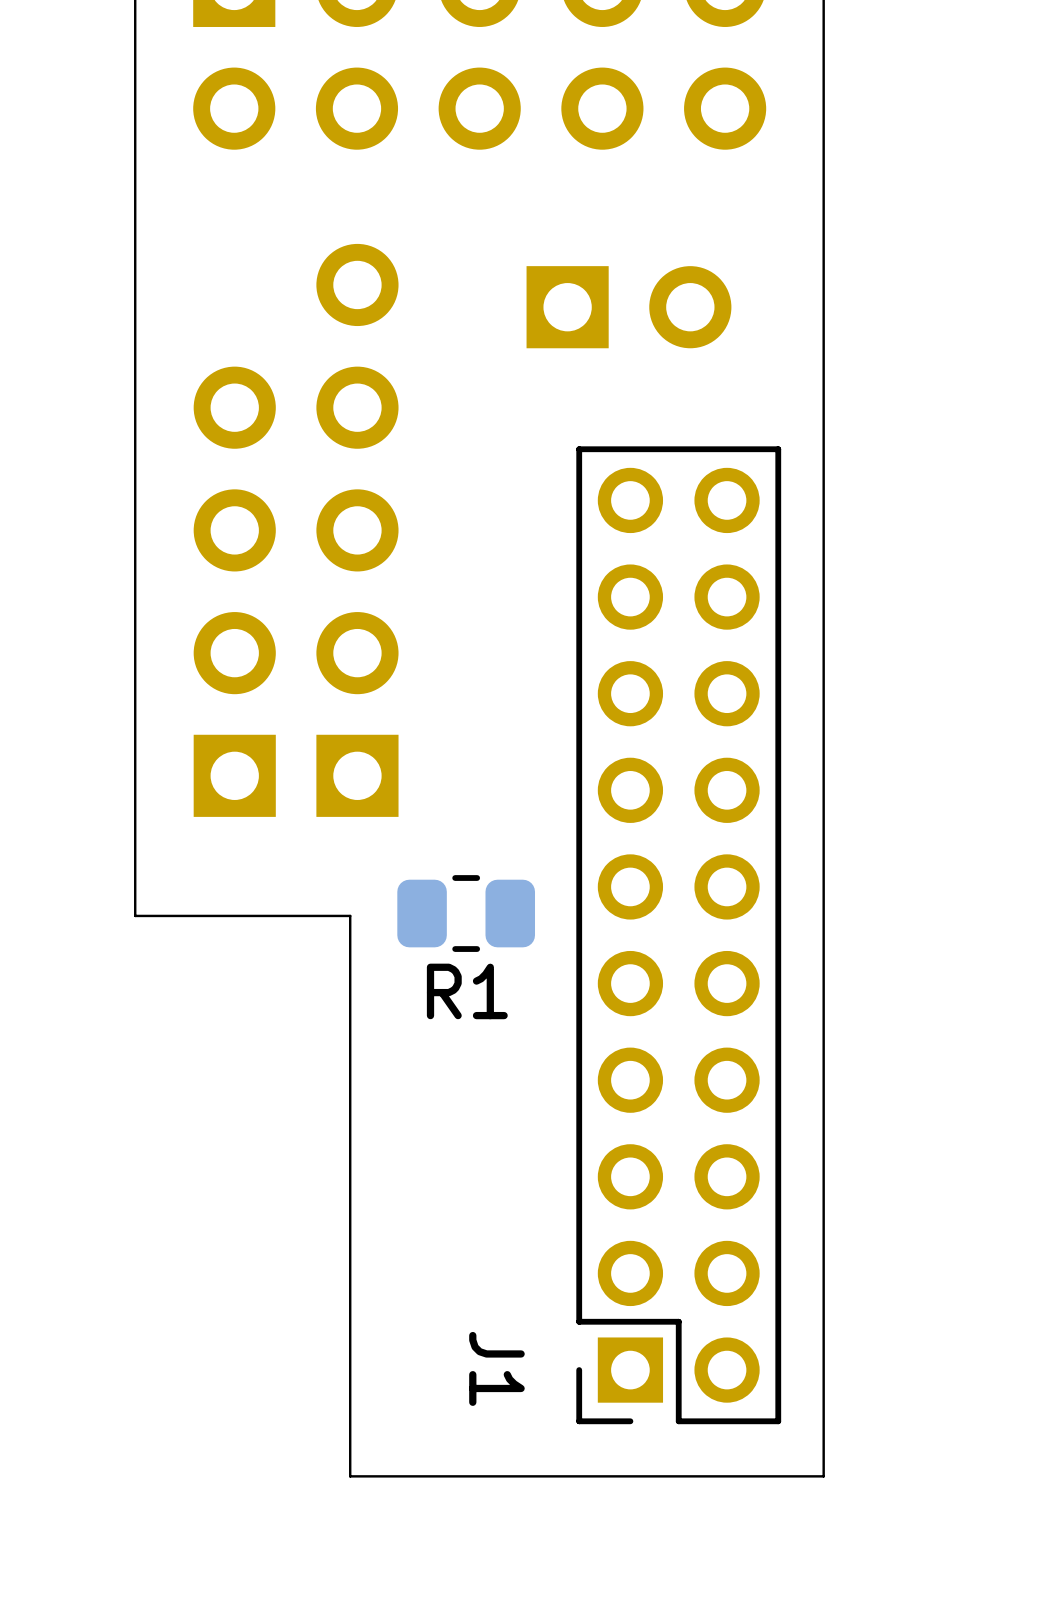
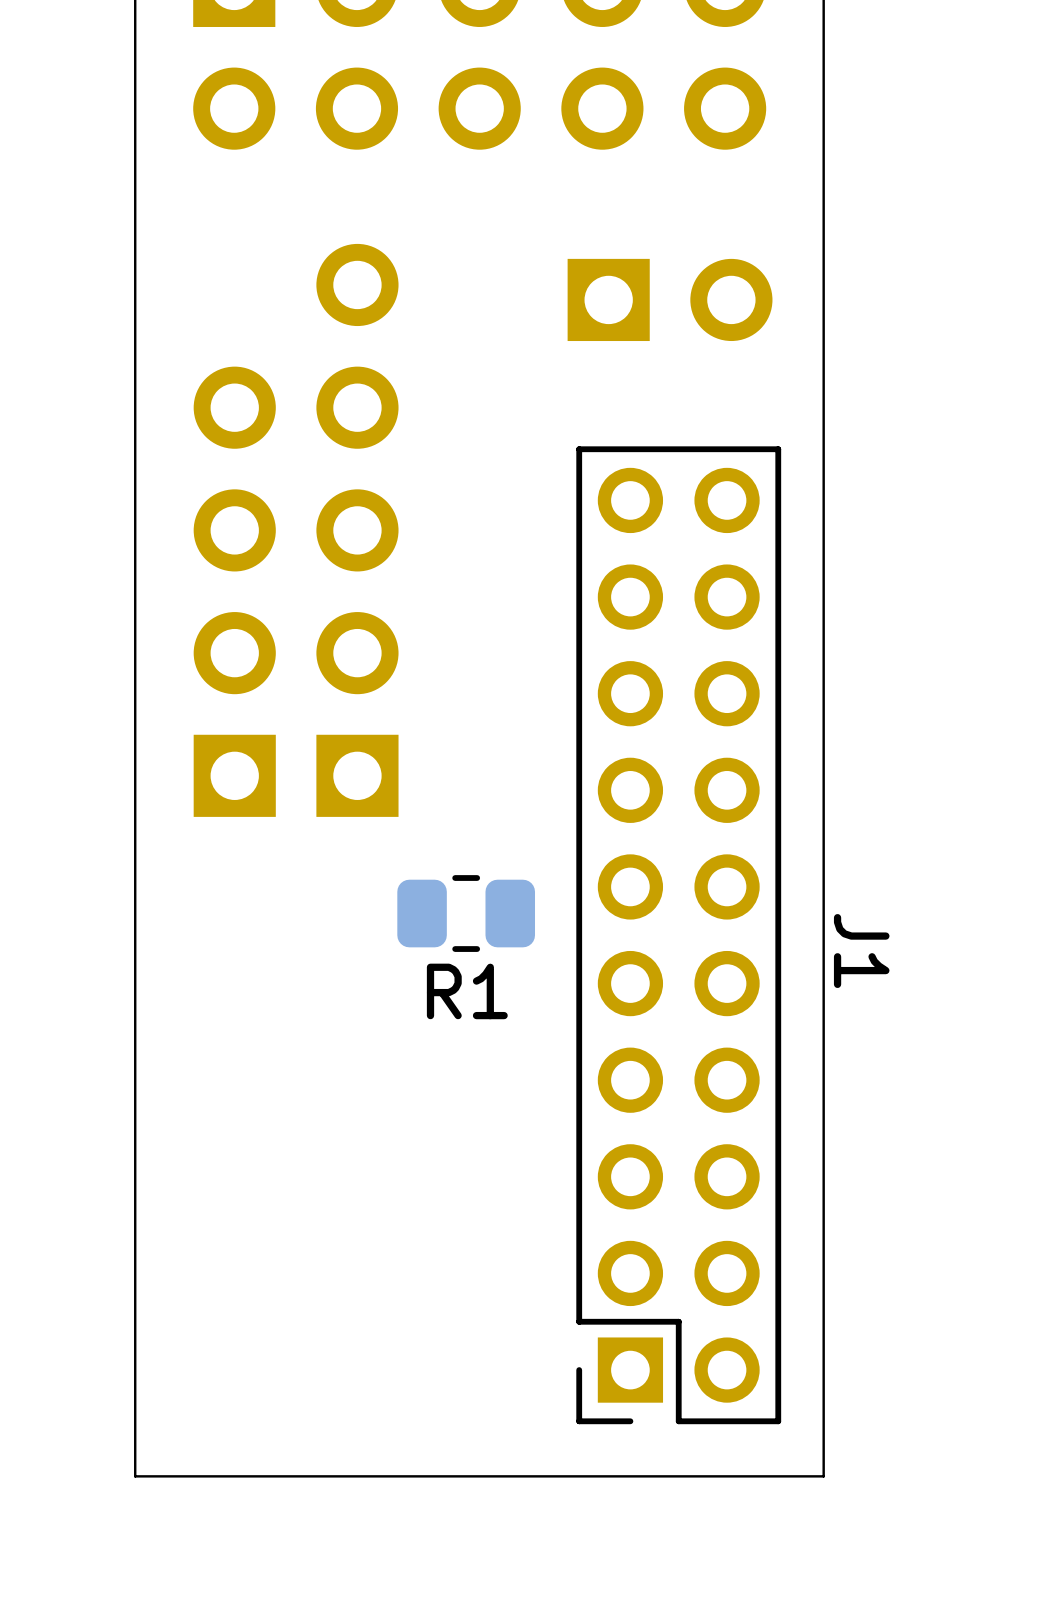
part position: (628, 307) -> (670, 299)
board edge: (135, 915) (350, 915) (350, 1476) -> (135, 915) (135, 1476) (350, 1476)
J1 name position: J1 (496, 1368) -> J1 (861, 951)

